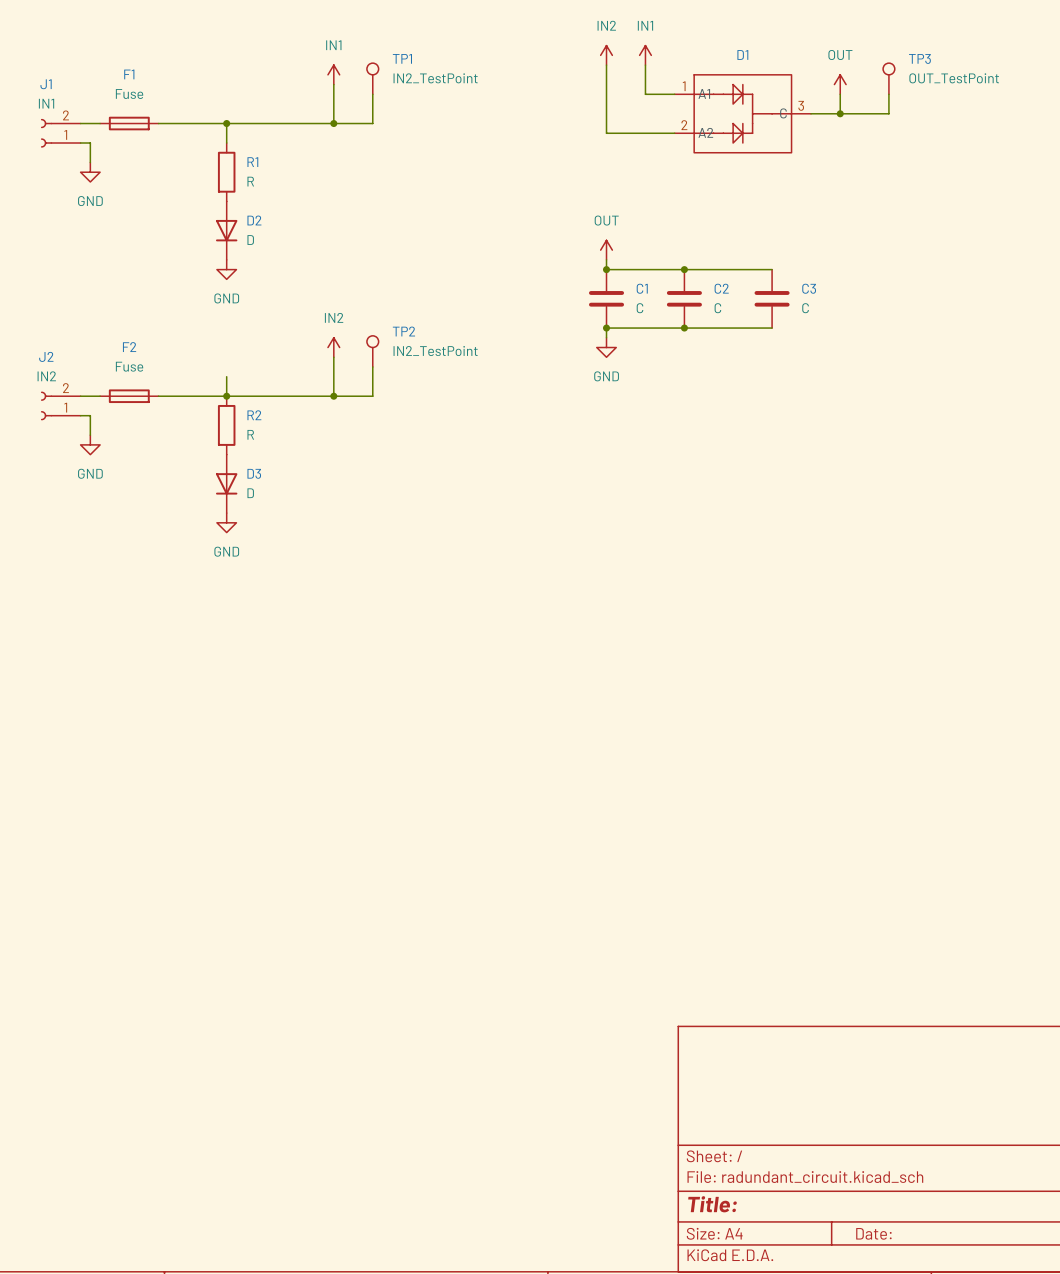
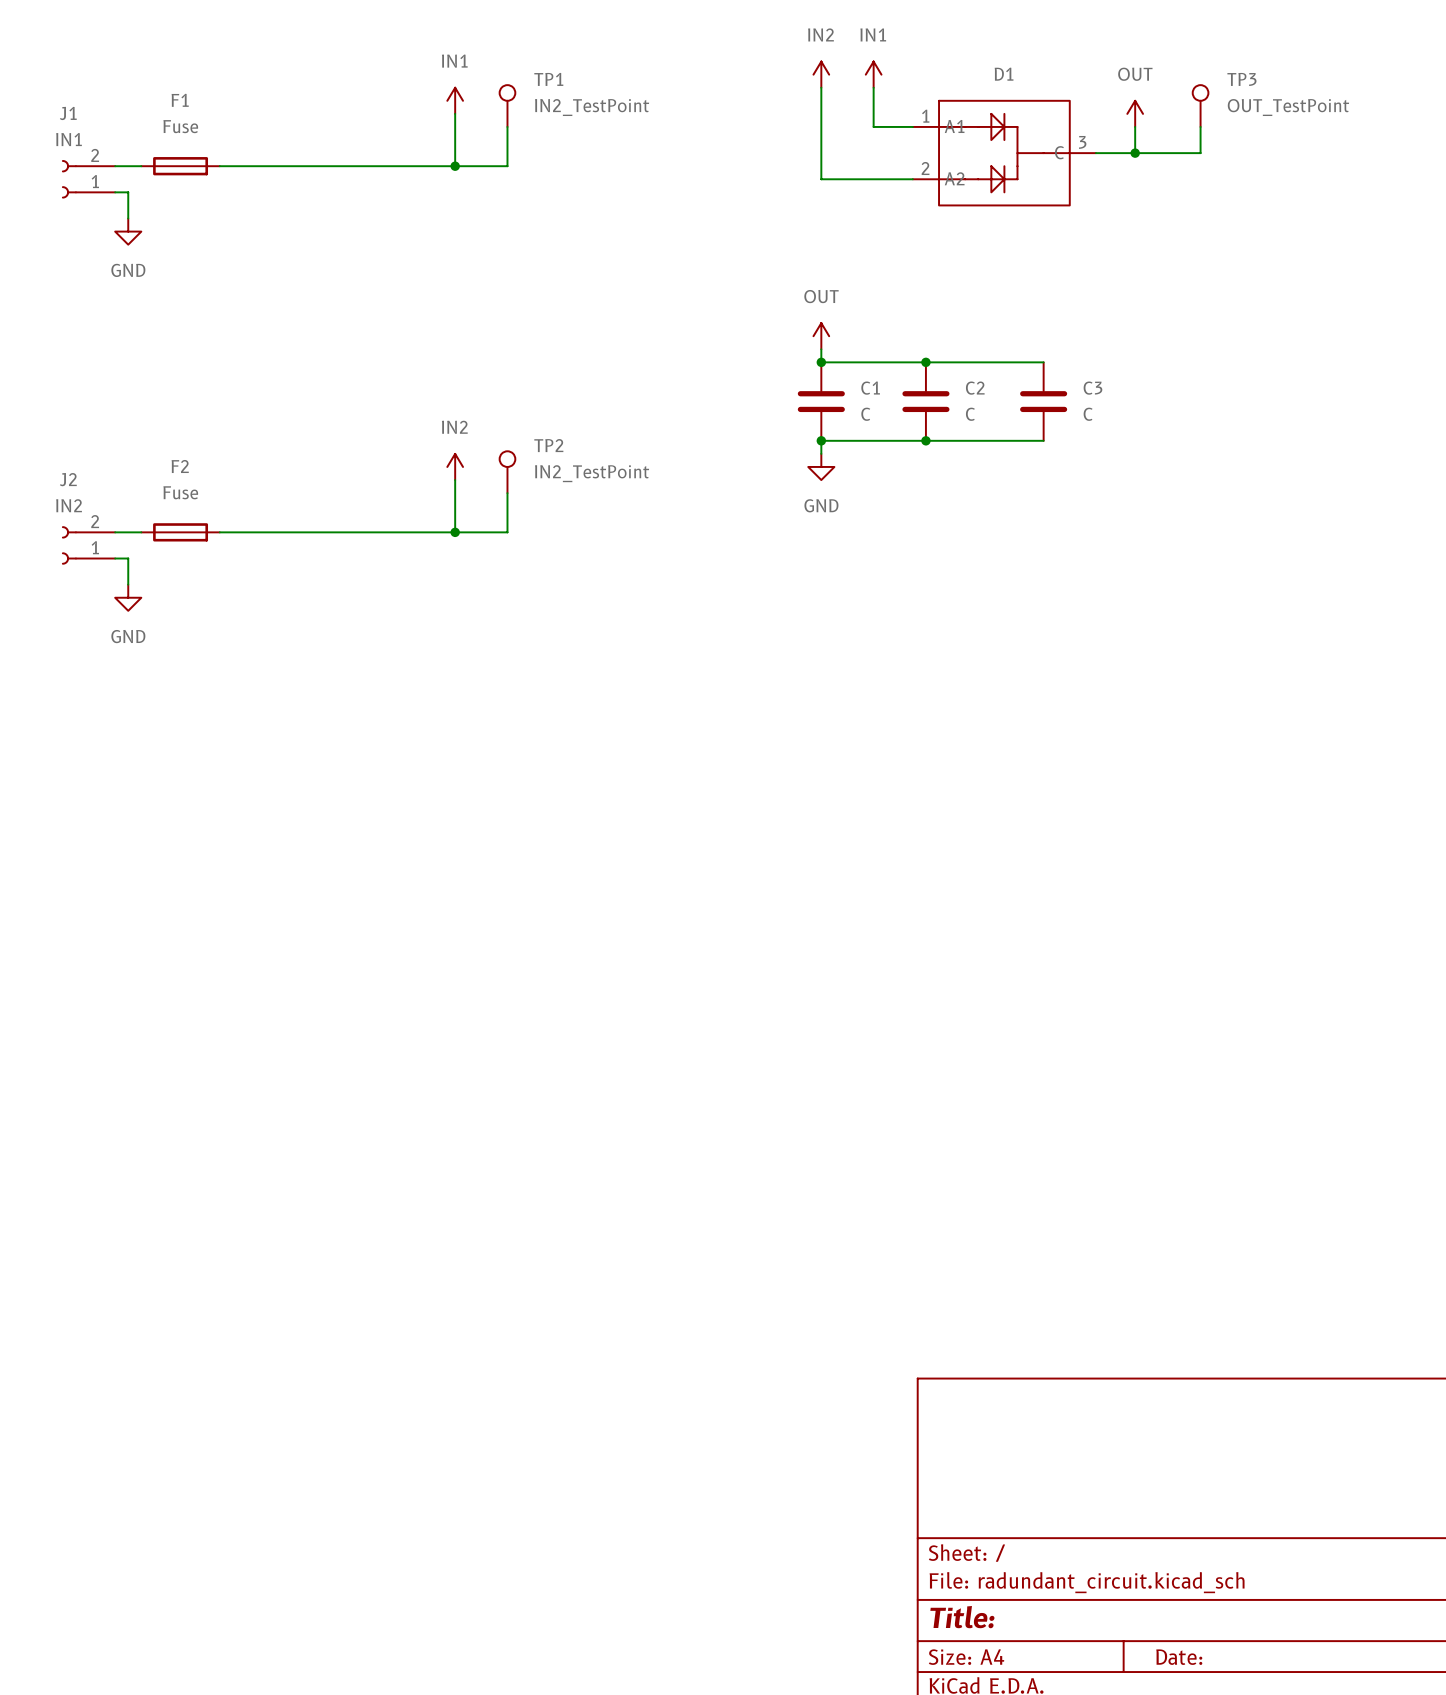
wire: (226, 123) (226, 143) -> none
junction: (226, 123) -> none
R1: R (226, 172) -> none
D2: D (226, 230) -> none
power symbol: GND (226, 269) -> none
wire: (226, 376) (226, 396) -> none
junction: (226, 396) -> none
R2: R (226, 425) -> none
D3: D (226, 483) -> none
power symbol: GND (226, 522) -> none

